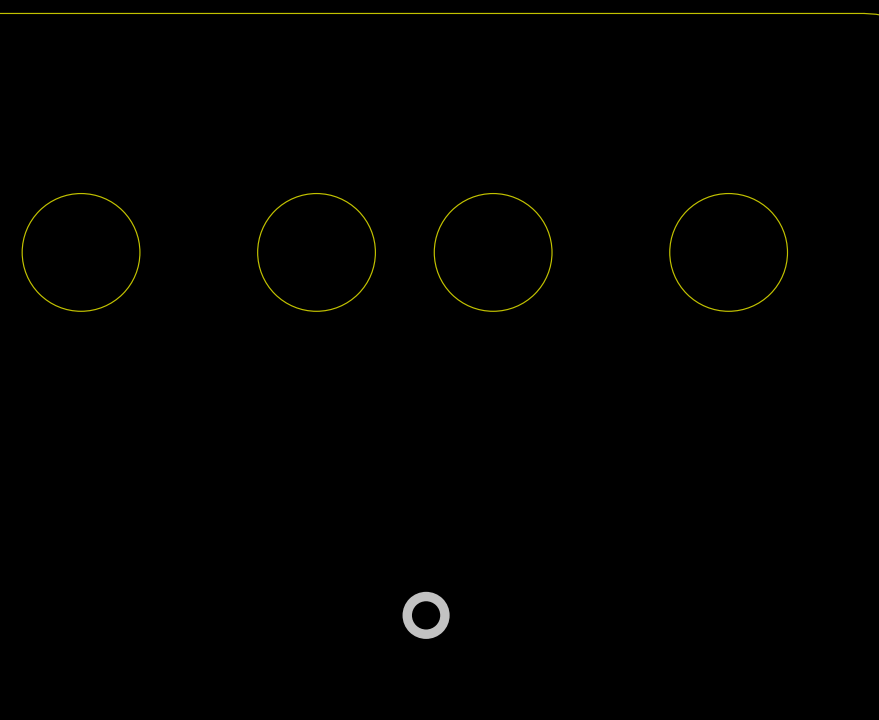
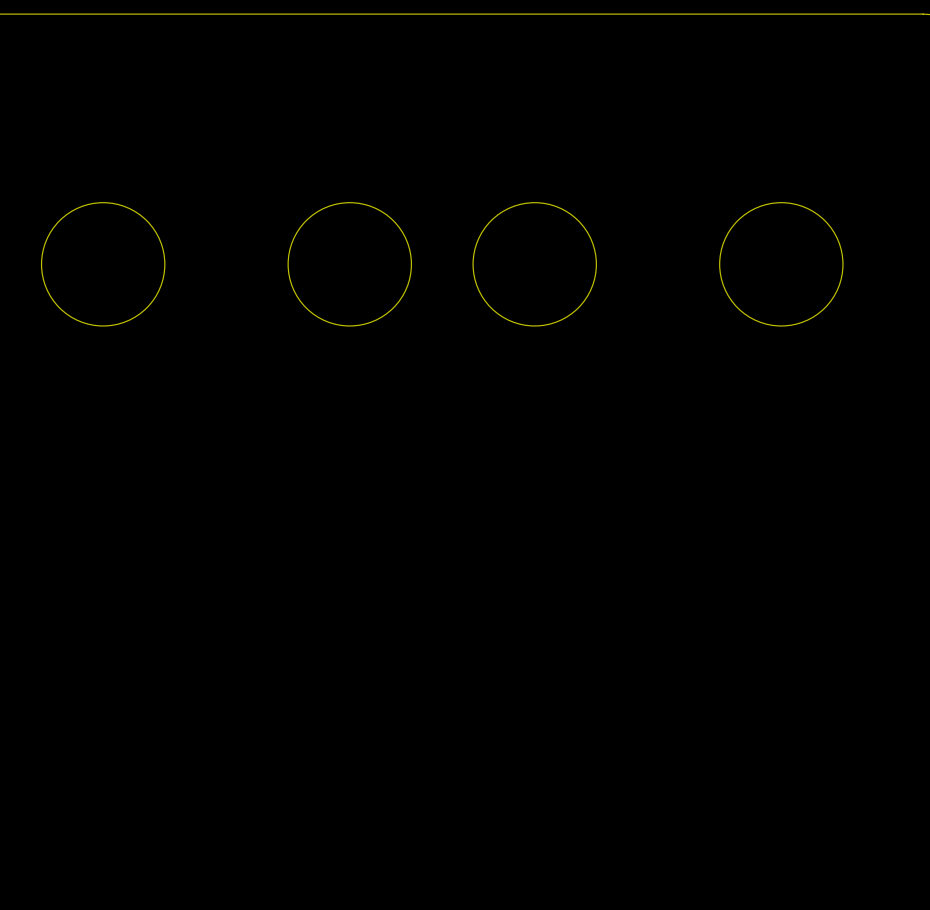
via: (426, 615) -> none

